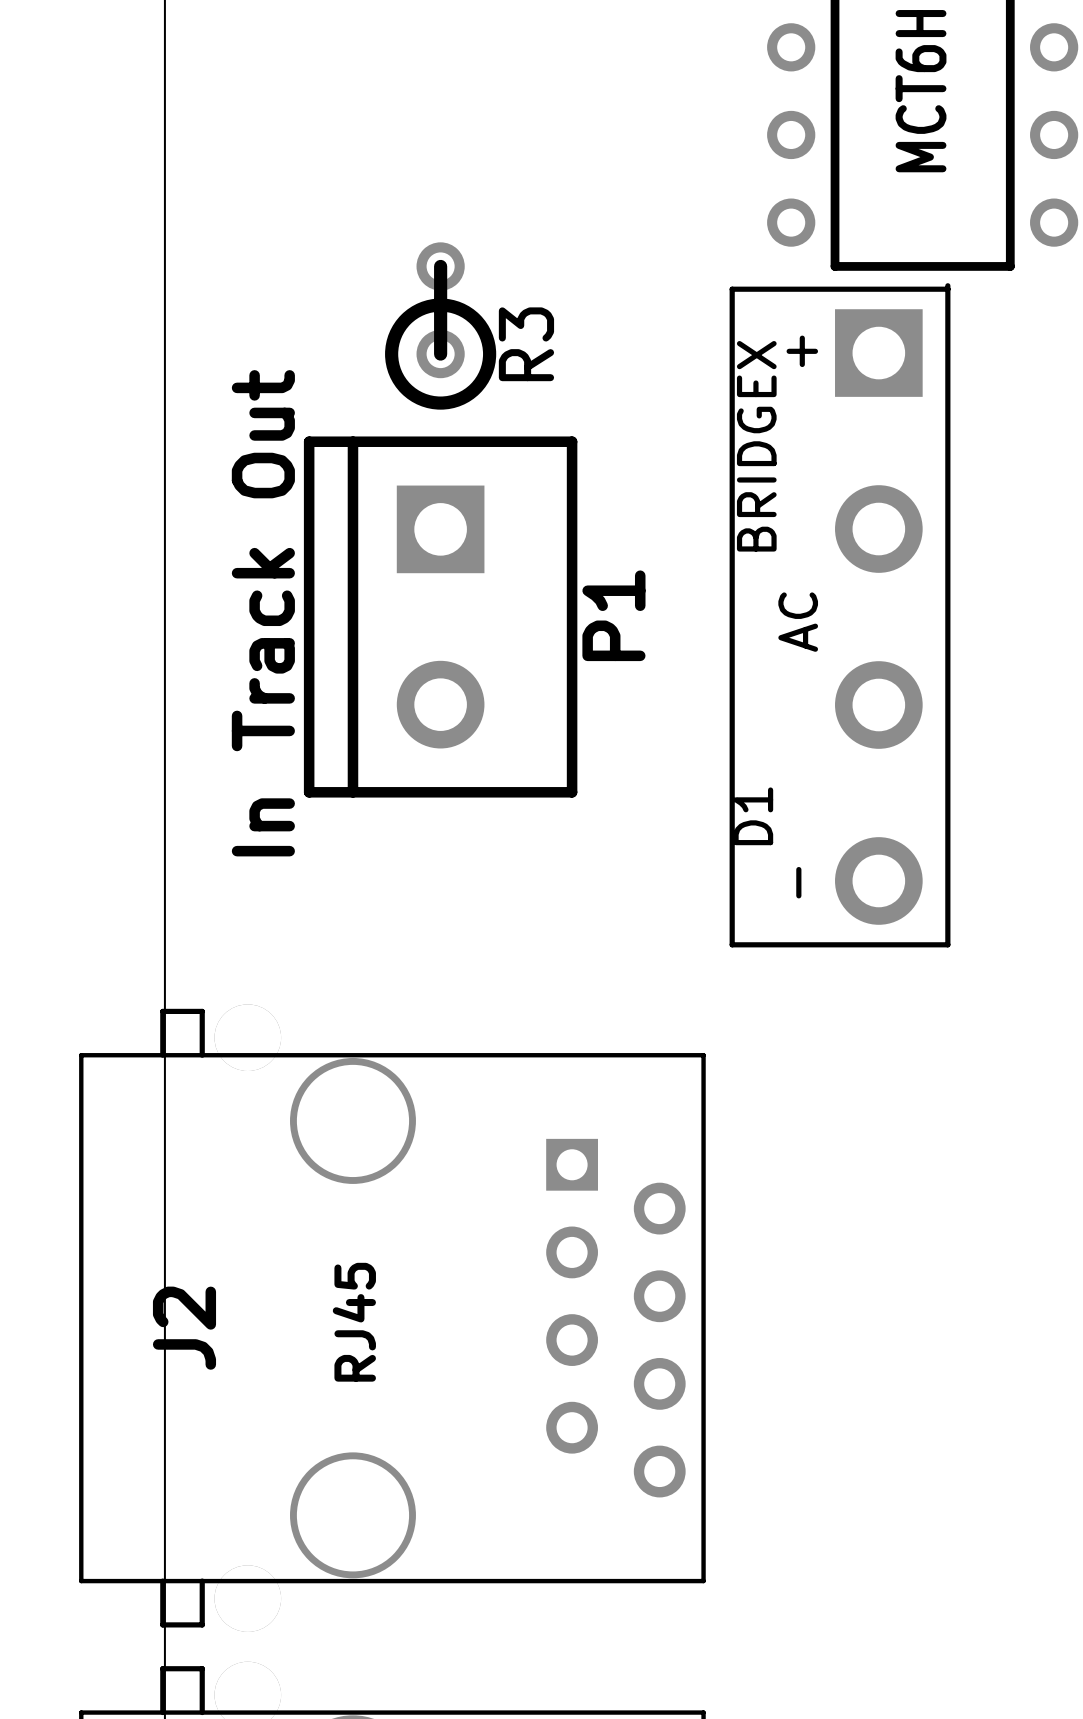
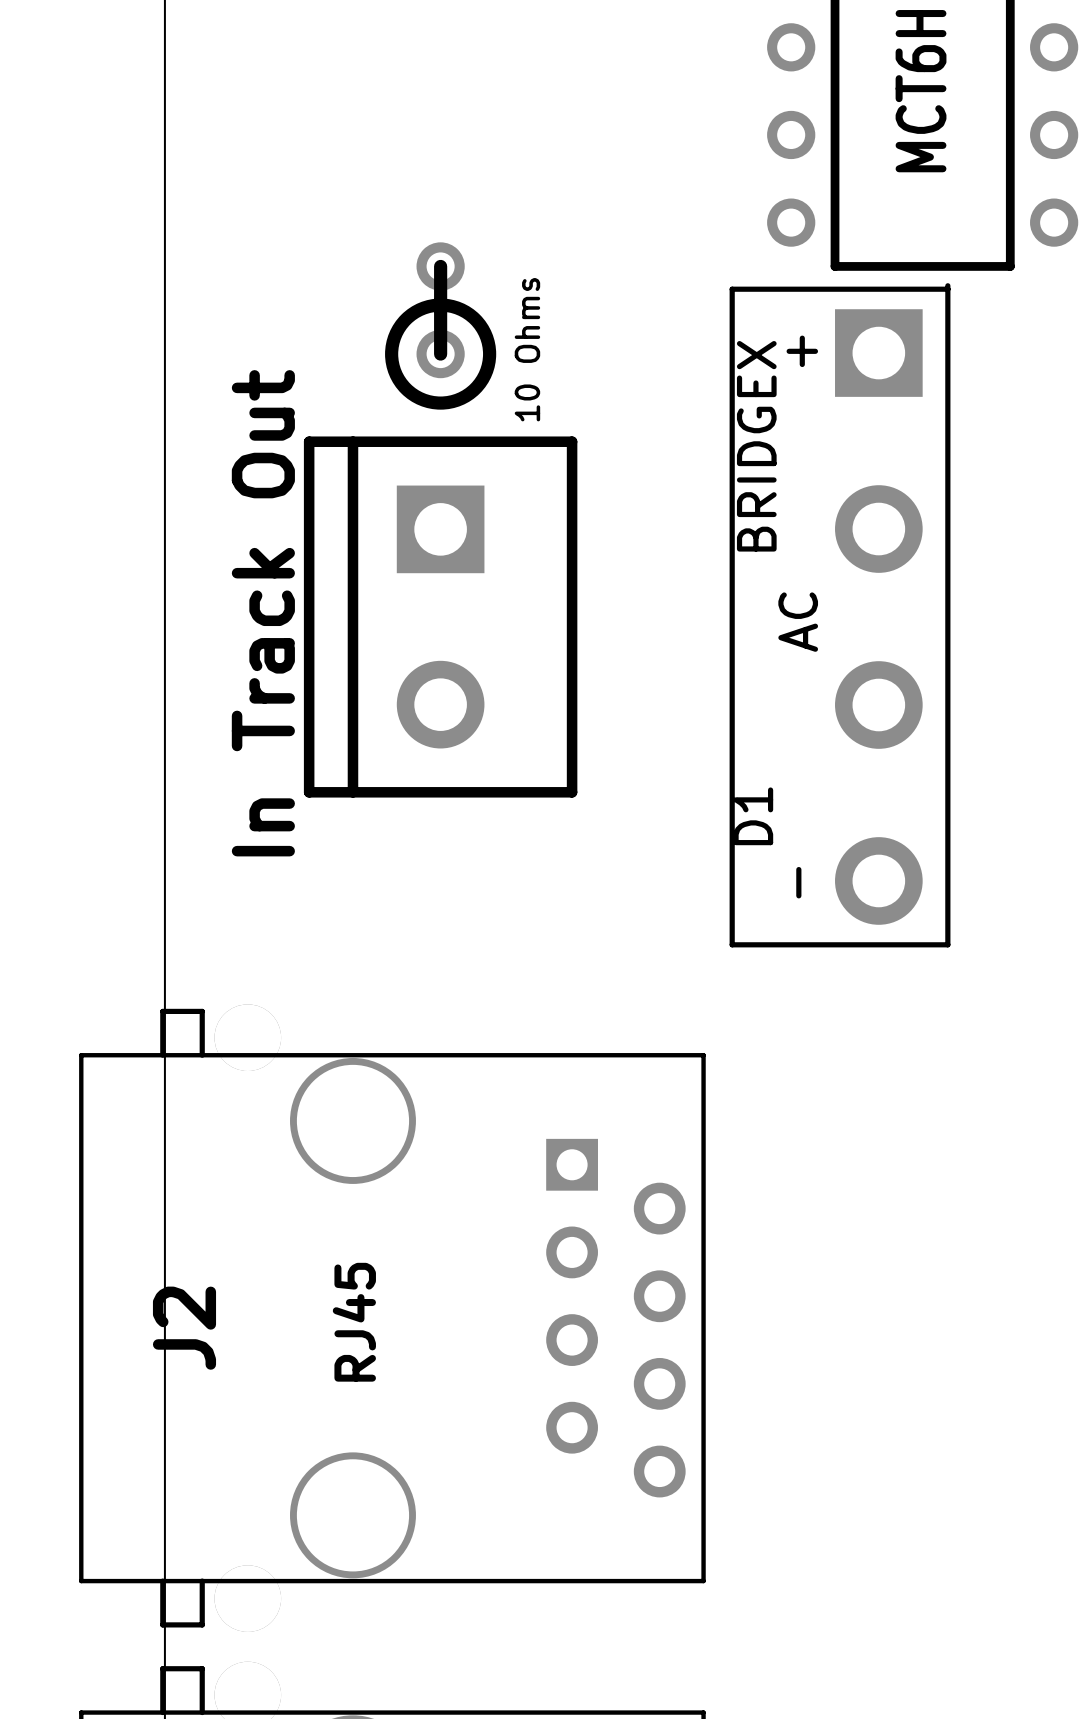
R3 name: R3 (526, 344) -> none
R3 value: none -> 10 Ohms (527, 349)
P1 name: P1 (613, 615) -> none

